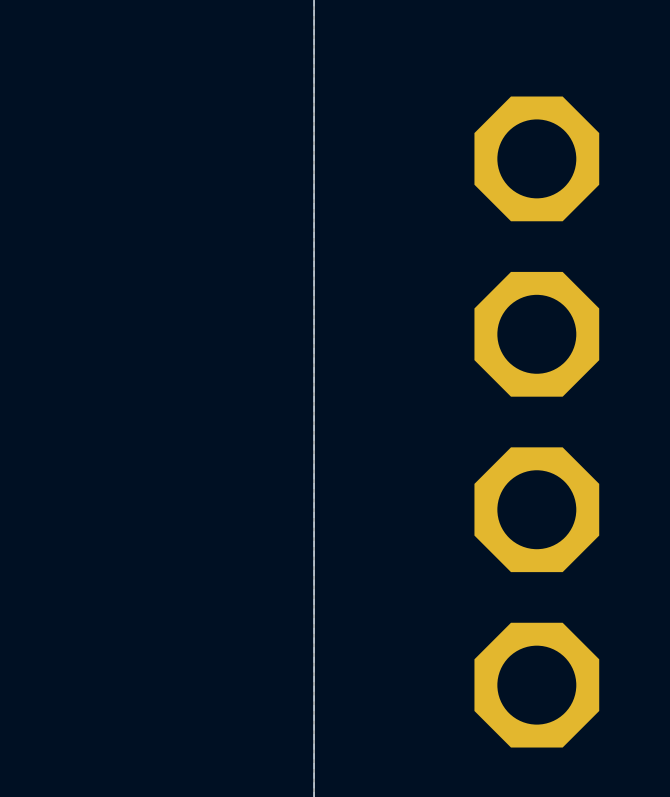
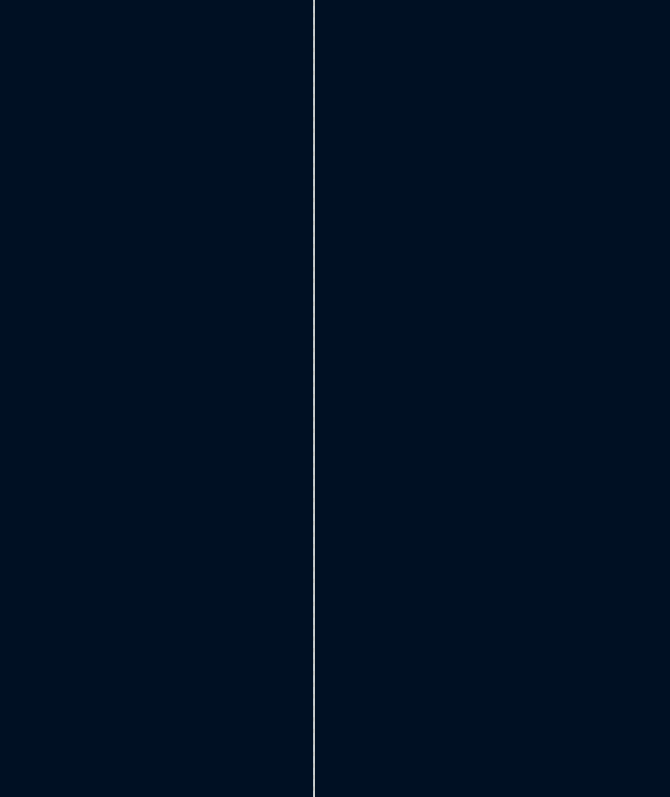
part: (536, 422) -> none

